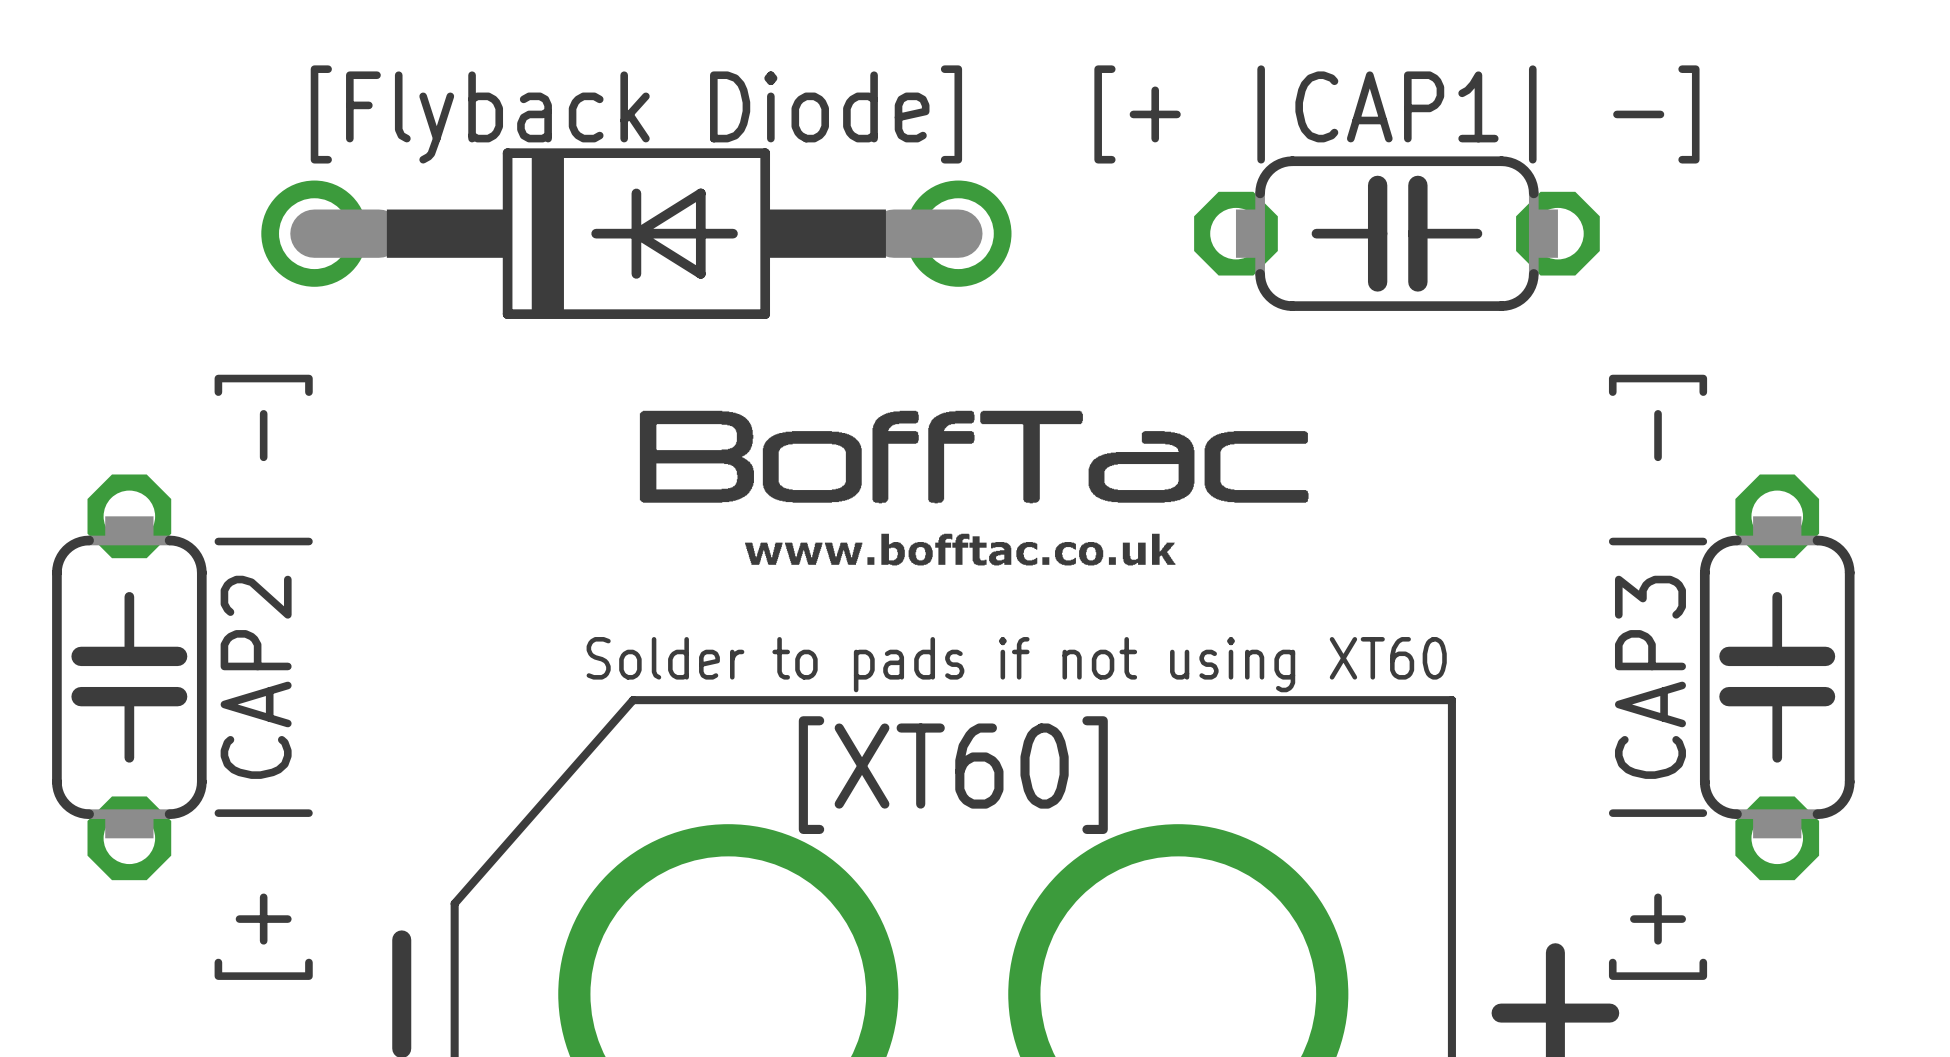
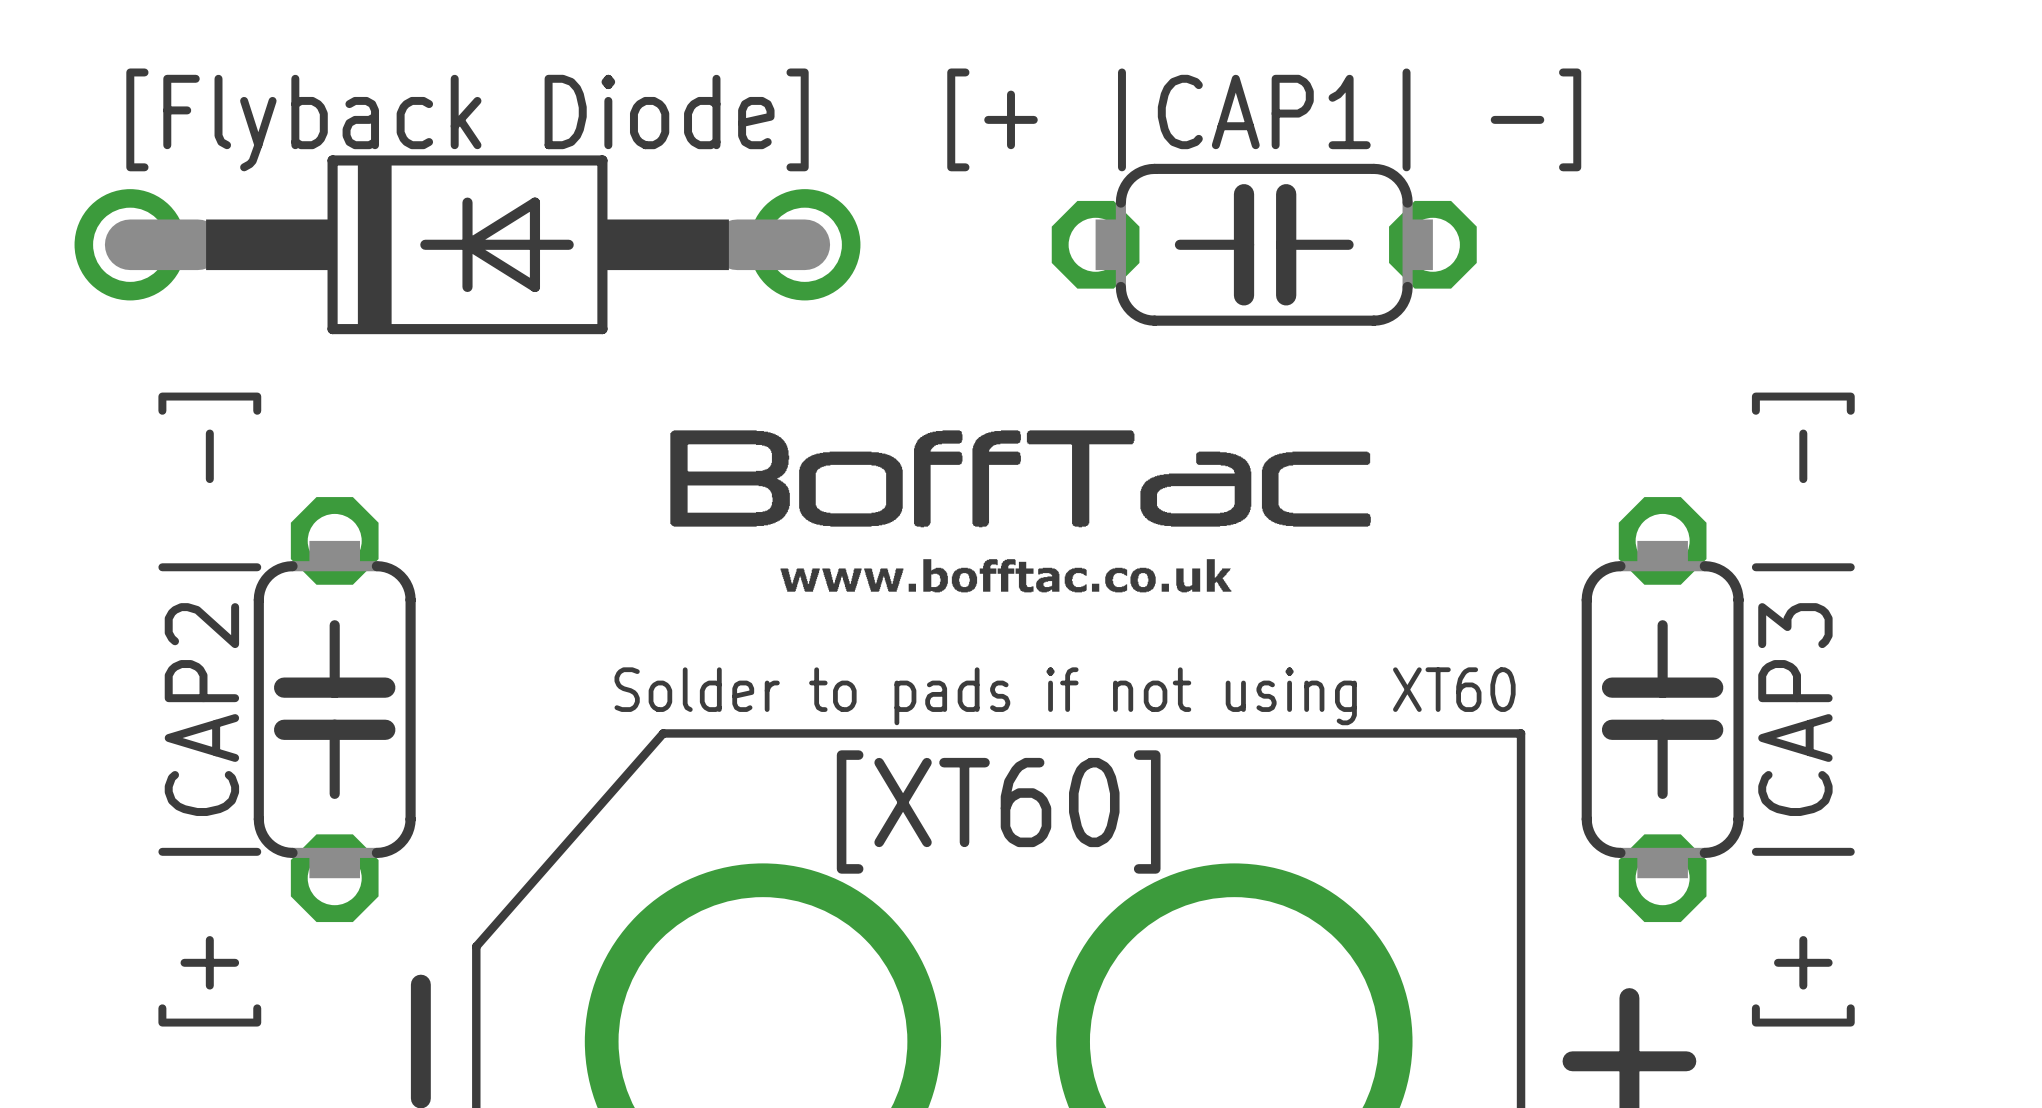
text position: [Flyback Diode] (636, 114) -> [Flyback Diode] (467, 119)
text position: [+ |CAP1| -] (1396, 114) -> [+ |CAP1| -] (1264, 119)
part position: (636, 233) -> (467, 244)
part position: (1396, 233) -> (1264, 244)
part position: (129, 677) -> (334, 709)
text position: [+ |CAP2| -] (263, 677) -> [+ |CAP2| -] (209, 709)
text position: [+ |CAP3| -] (1658, 677) -> [+ |CAP3| -] (1803, 709)
part position: (1777, 677) -> (1662, 709)

